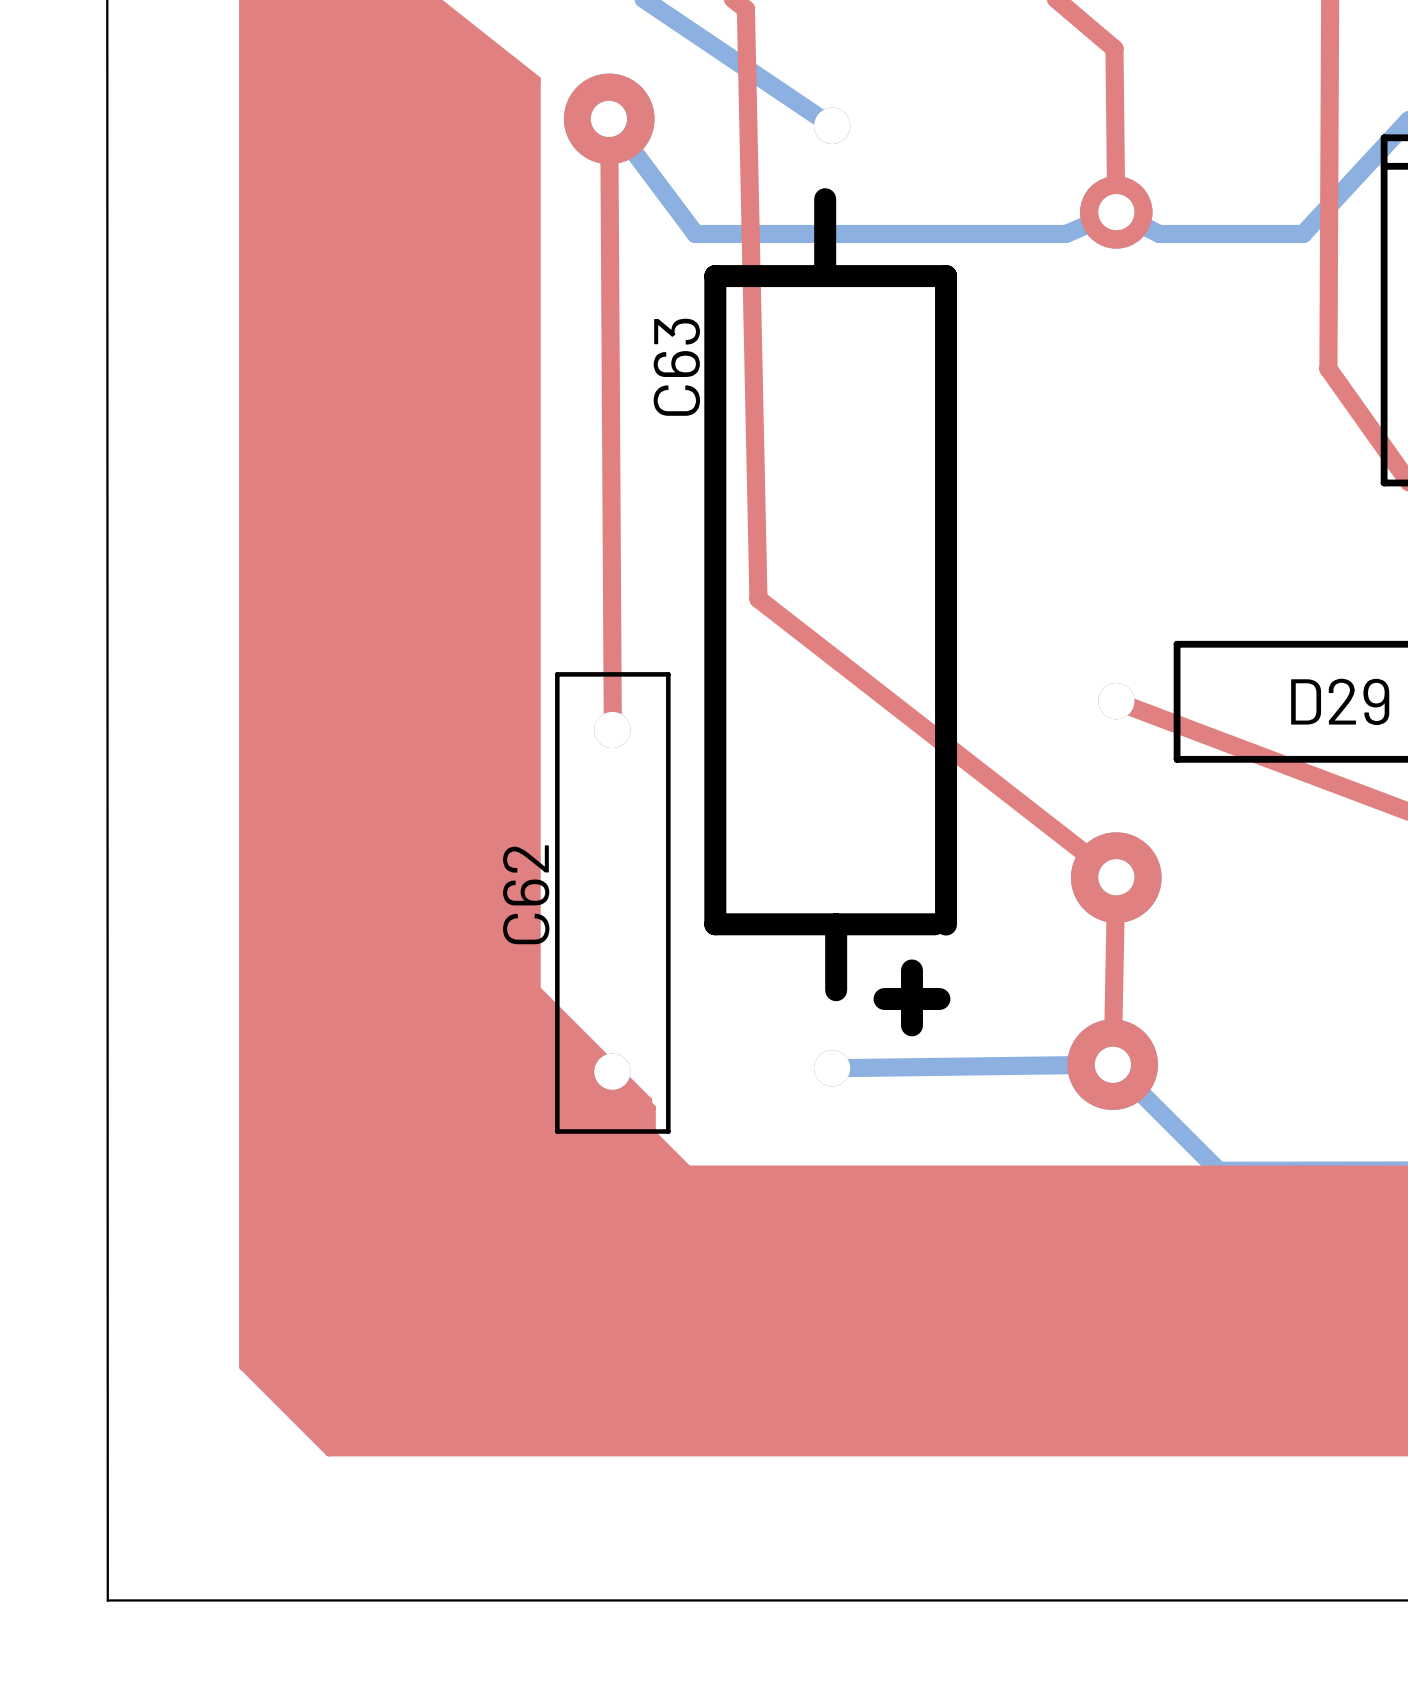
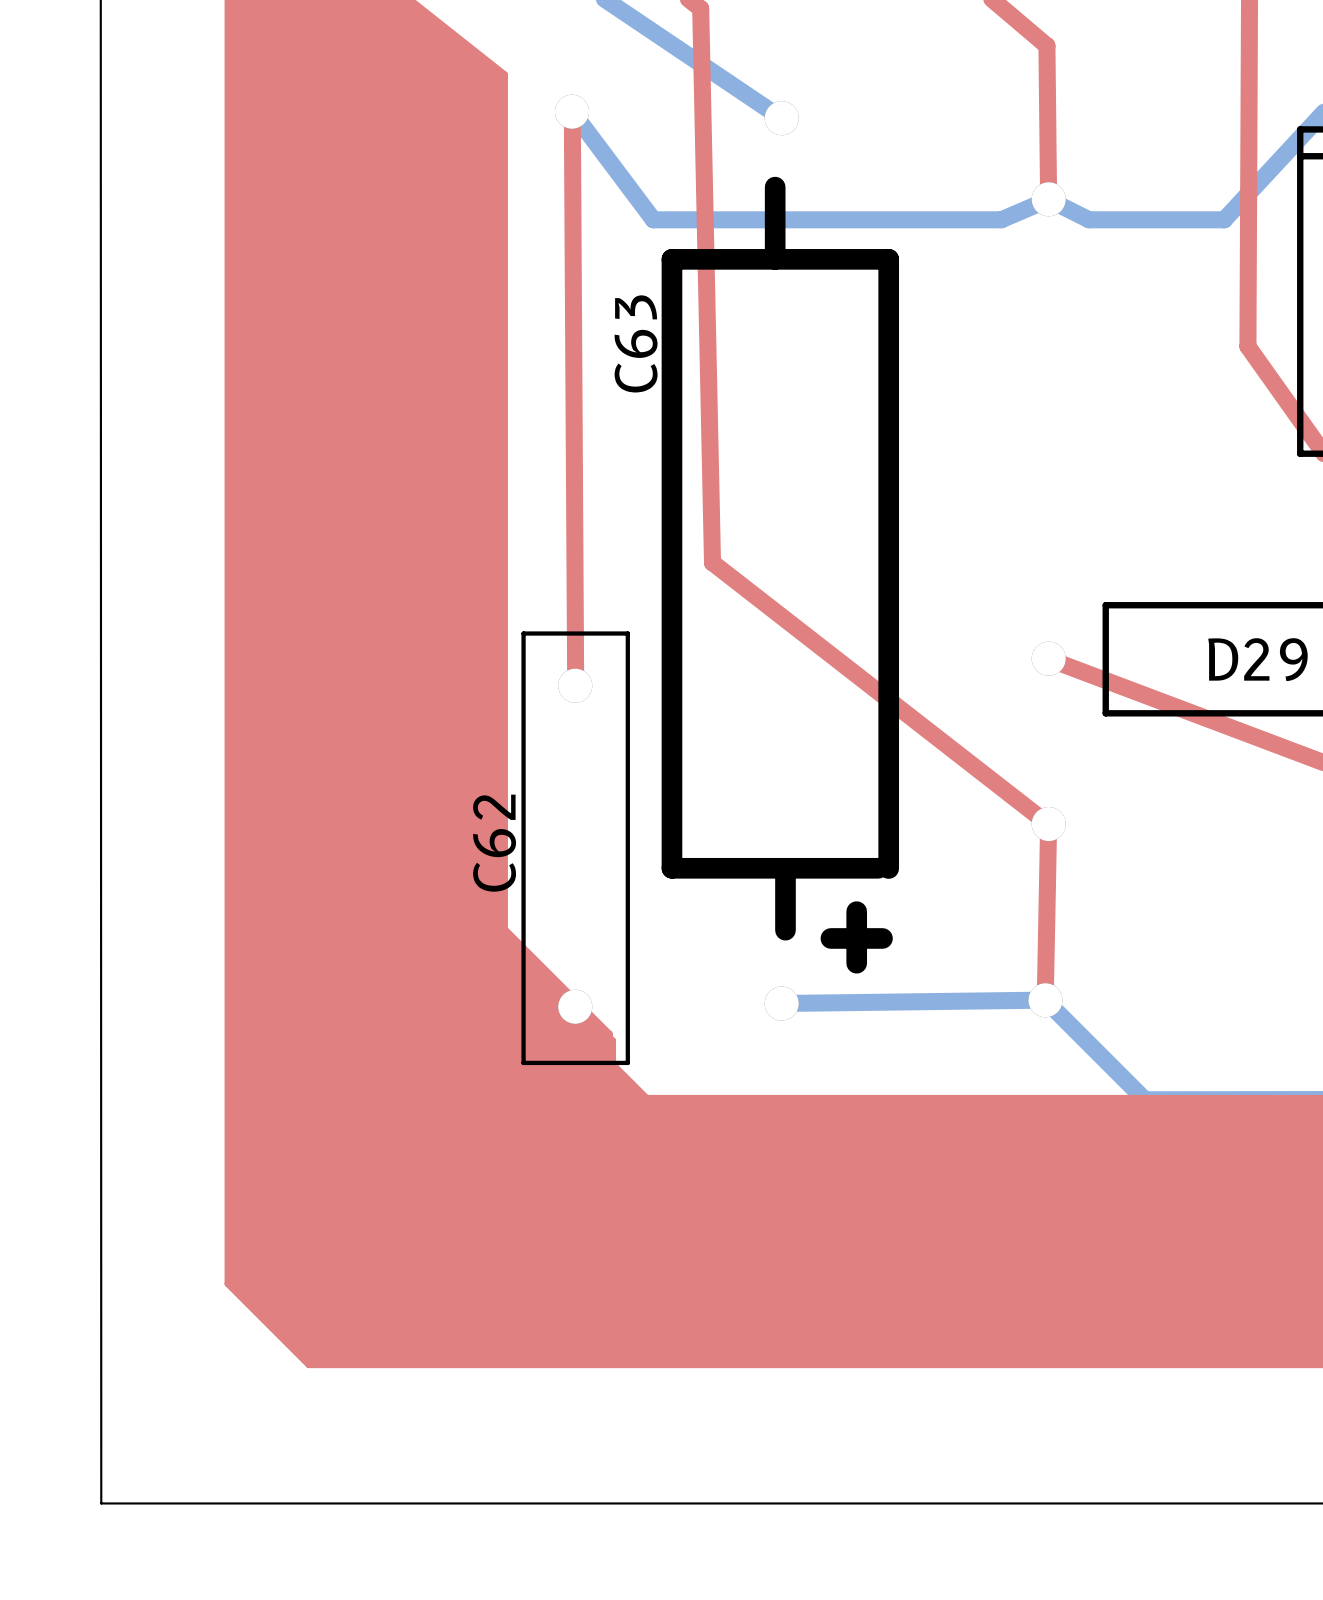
drawing: [563, 73, 655, 165] -> none
drawing: [1080, 176, 1153, 249] -> none
drawing: [1070, 832, 1162, 923] -> none
drawing: [1067, 1019, 1158, 1110] -> none

